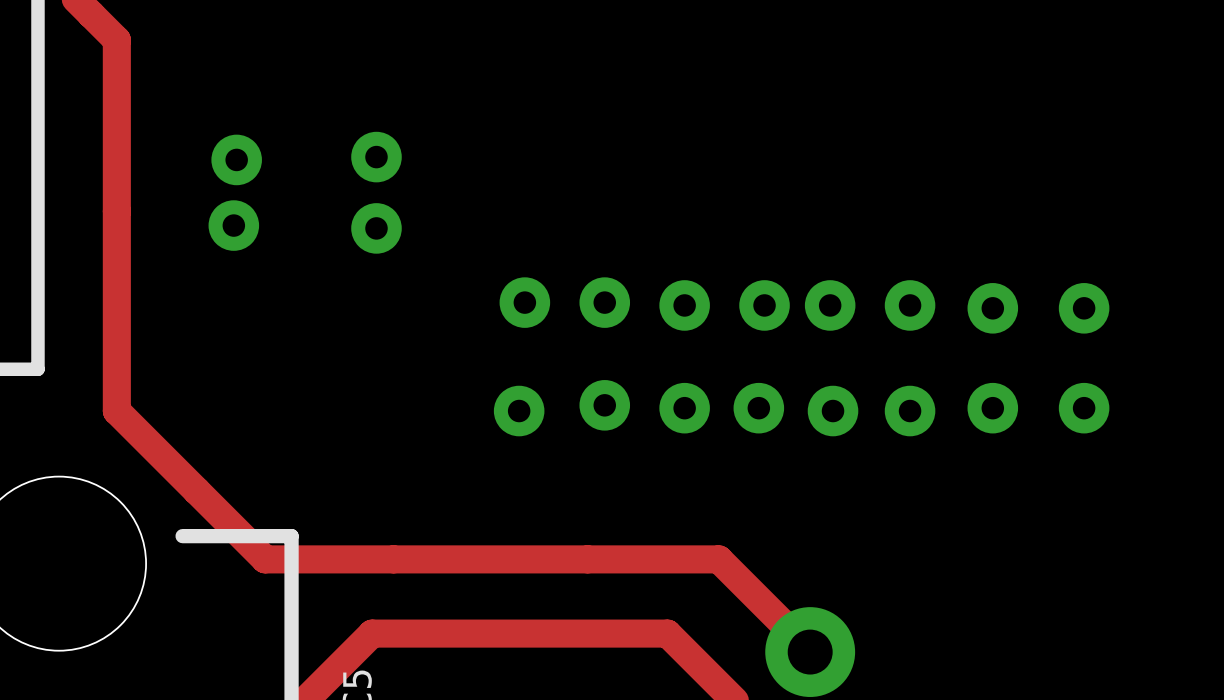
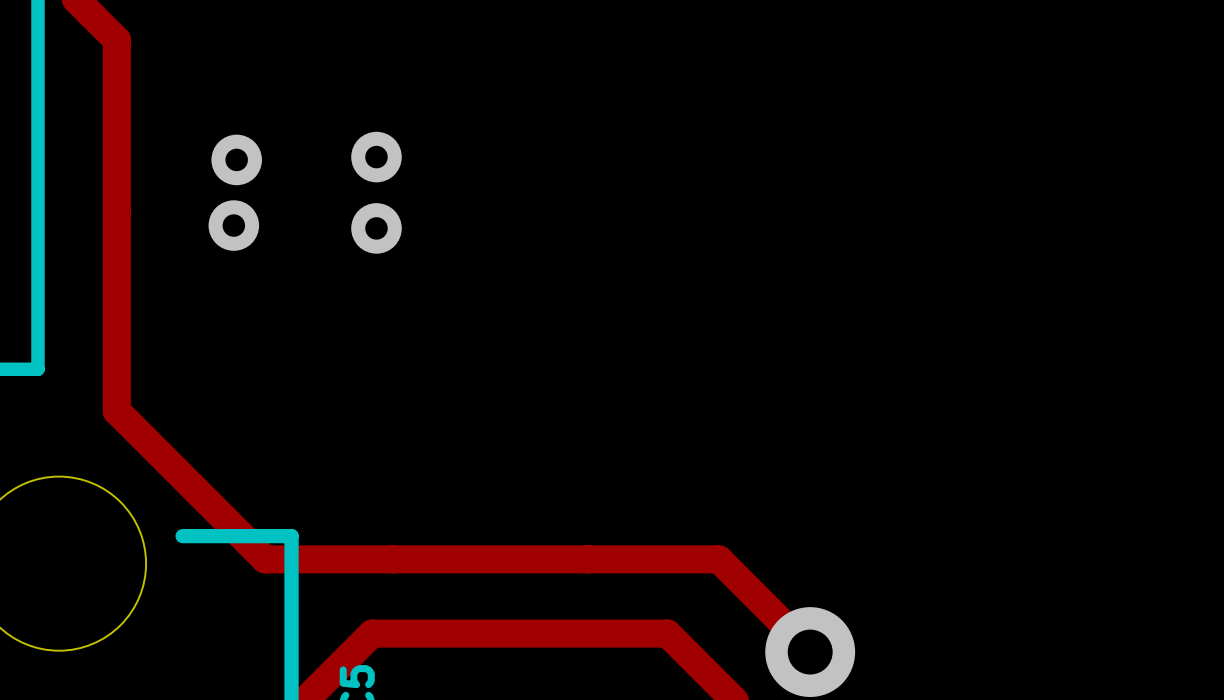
via: (524, 302) -> none
via: (604, 302) -> none
via: (684, 305) -> none
via: (764, 305) -> none
via: (830, 305) -> none
via: (910, 305) -> none
via: (992, 308) -> none
via: (1084, 308) -> none
via: (604, 405) -> none
via: (684, 408) -> none
via: (758, 408) -> none
via: (992, 408) -> none
via: (1084, 408) -> none
via: (519, 411) -> none
via: (833, 411) -> none
via: (910, 411) -> none

